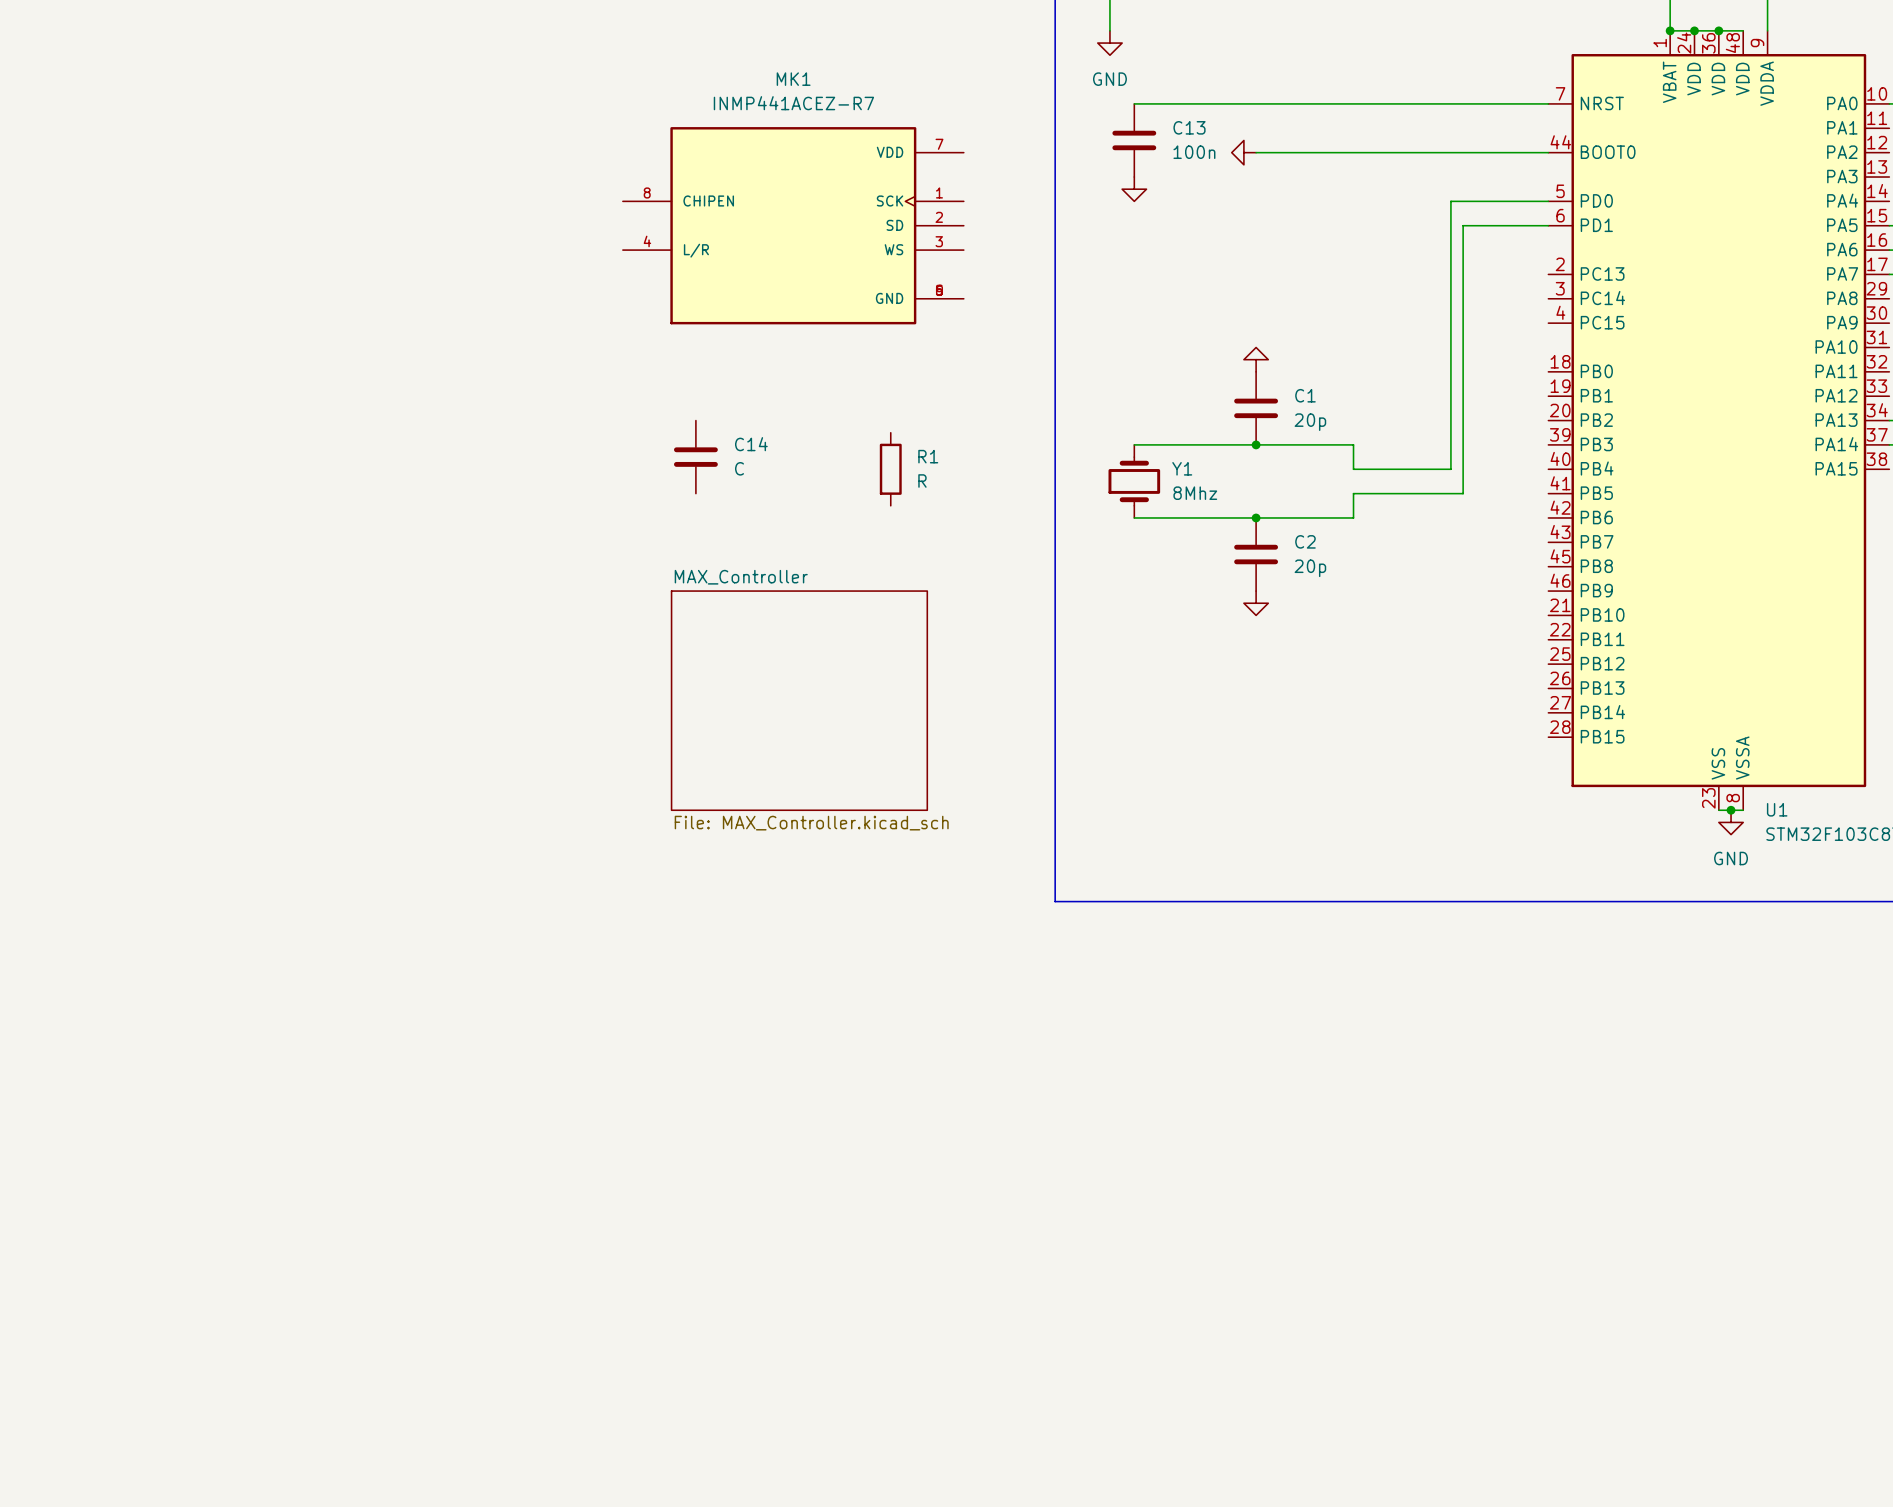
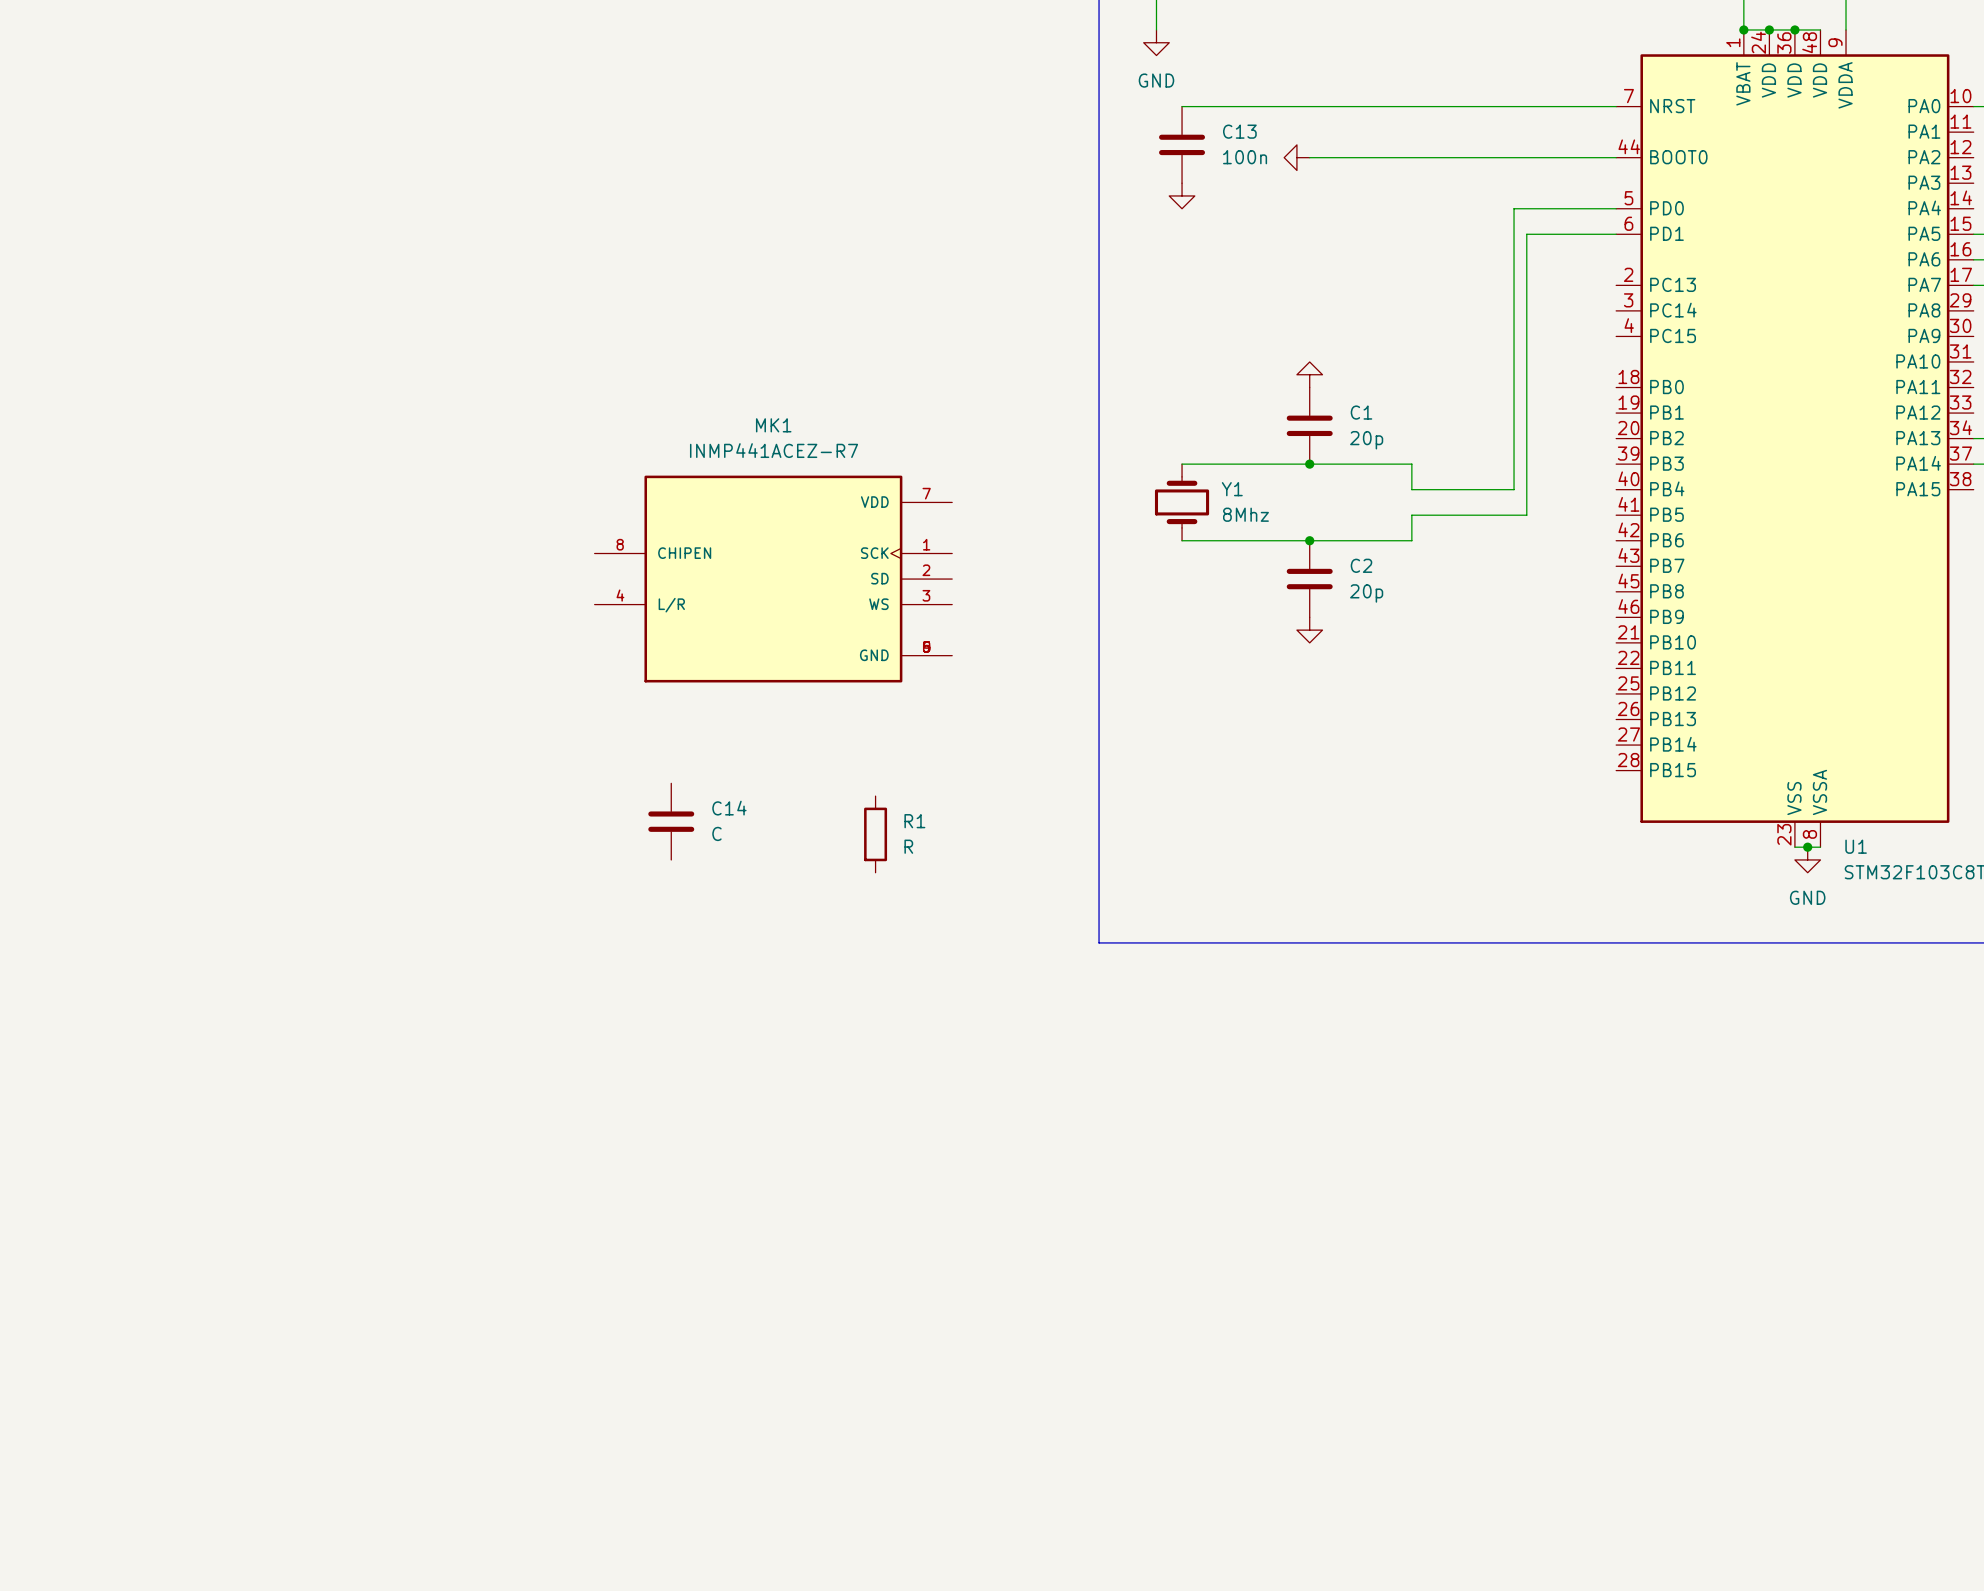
MK1 position: (793, 225) -> (773, 579)
C14 position: (695, 457) -> (671, 821)
R1 position: (890, 469) -> (875, 834)
sheet MAX_Controller: File: MAX_Controller.kicad_sch (799, 700) -> none

